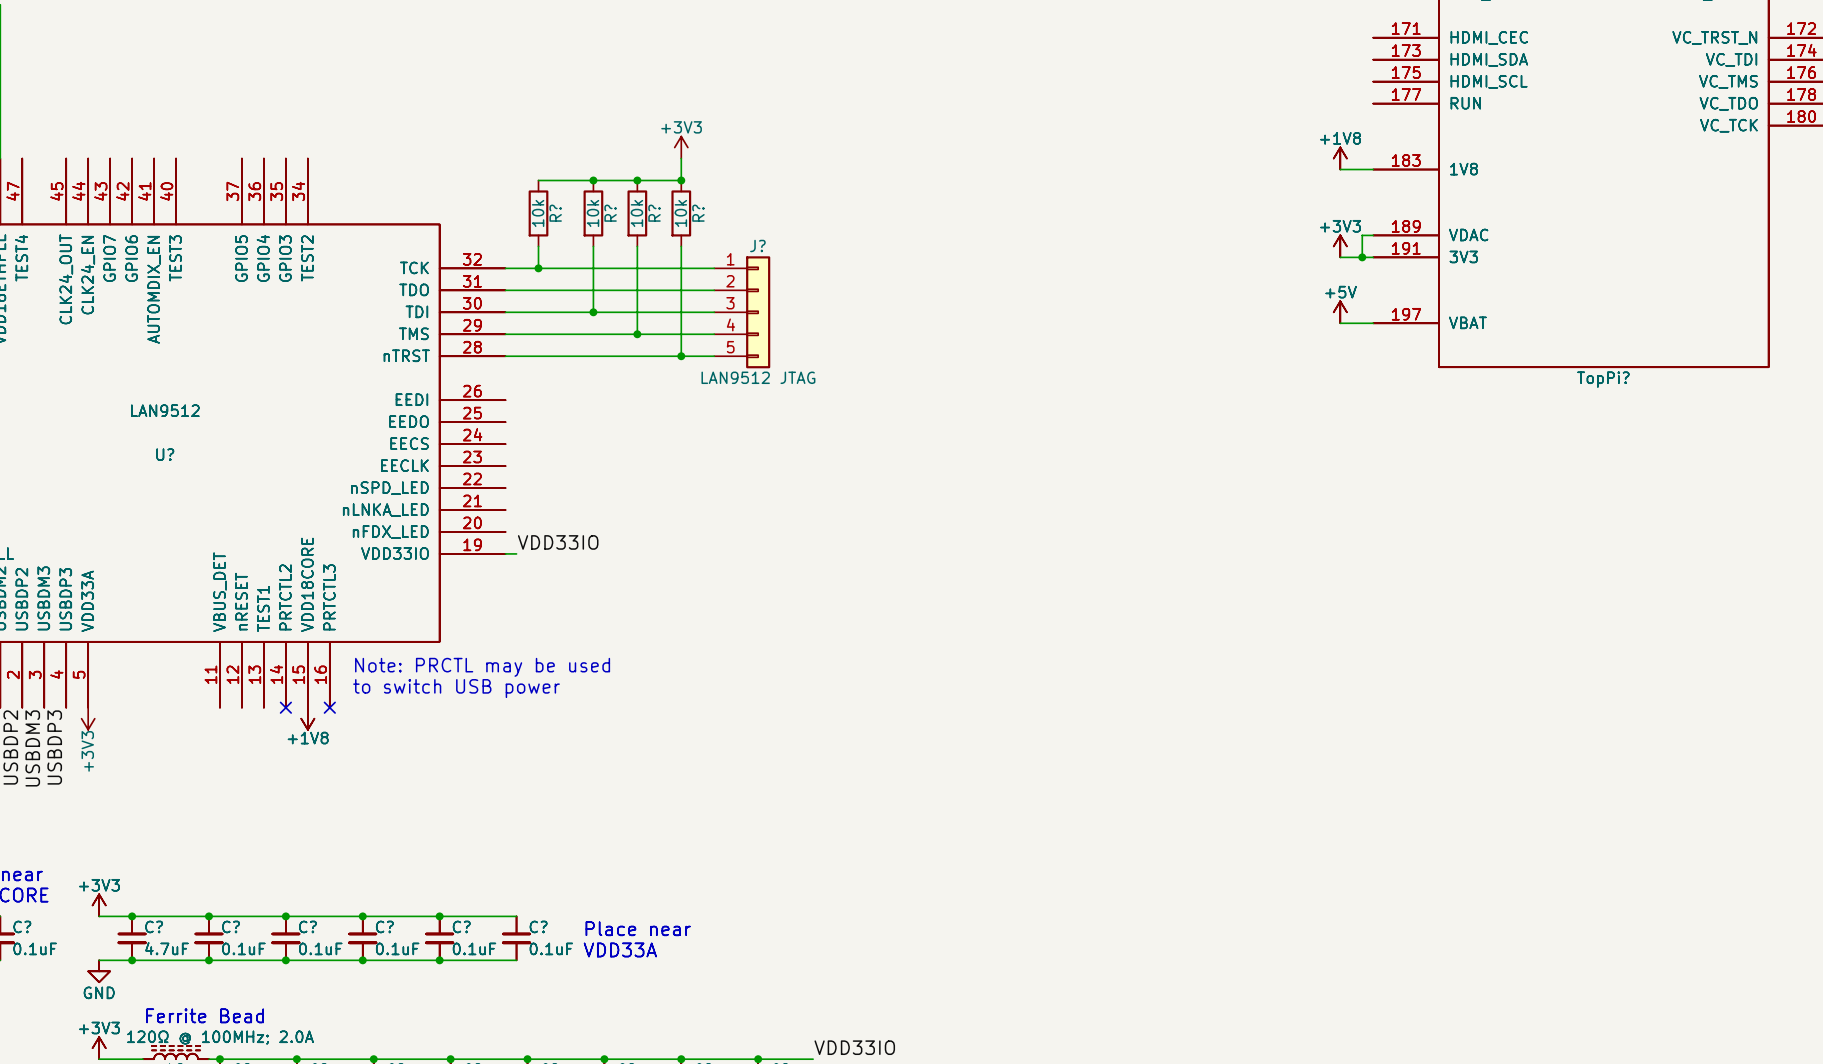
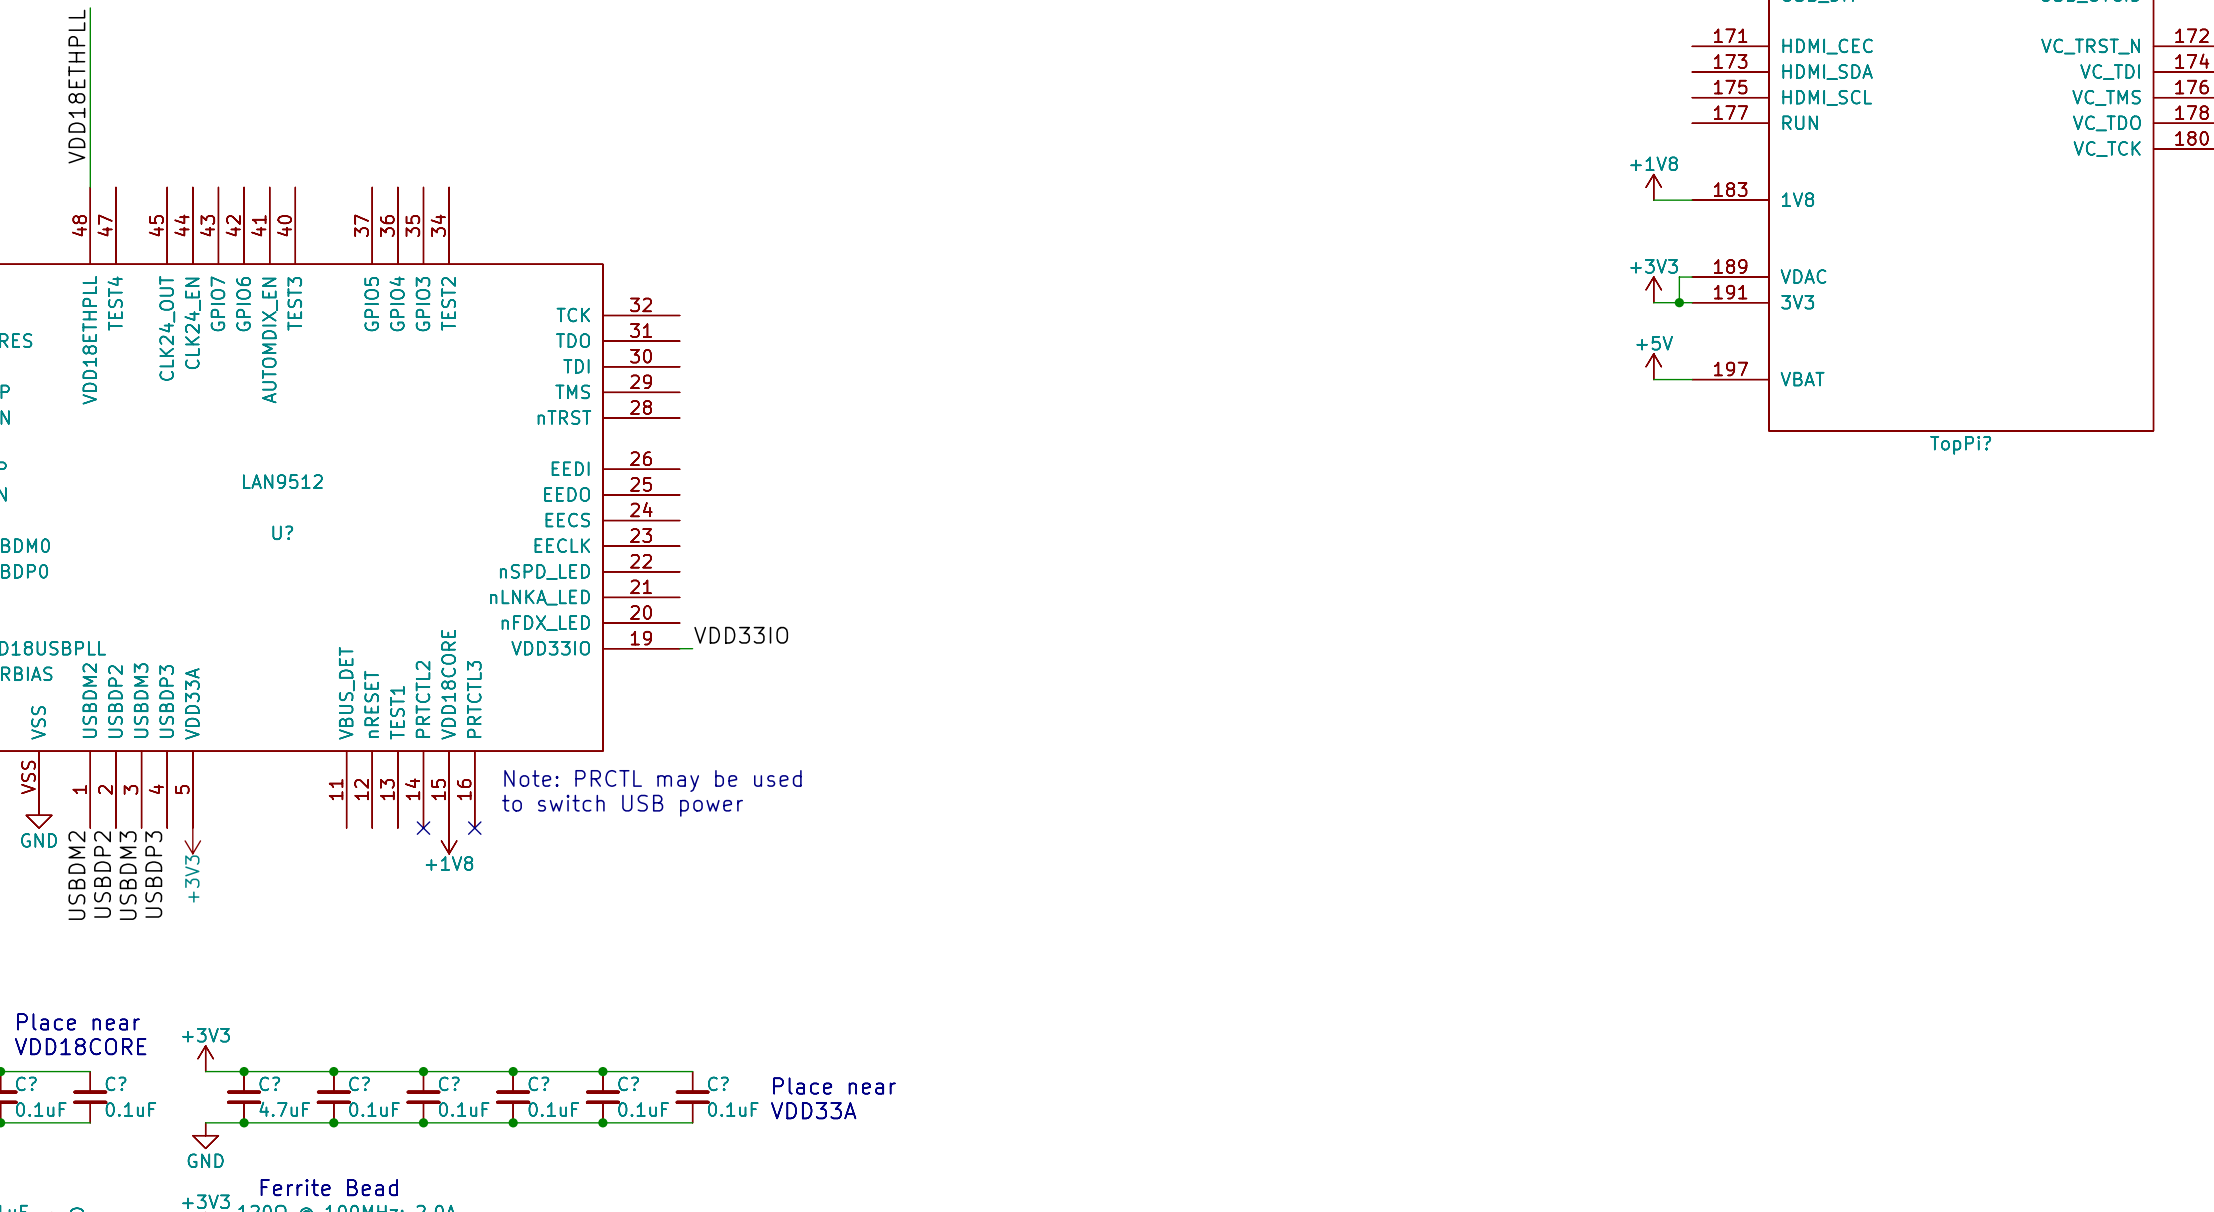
power symbol: +3V3 (681, 147) -> none
wire: (681, 158) (681, 180) (538, 180) -> none
junction: (593, 180) -> none
junction: (637, 180) -> none
junction: (681, 180) -> none
R?: 10k (538, 213) -> none
R?: 10k (593, 213) -> none
R?: 10k (637, 213) -> none
R?: 10k (681, 213) -> none
wire: (538, 246) (538, 268) -> none
wire: (593, 246) (593, 312) -> none
wire: (637, 246) (637, 334) -> none
wire: (681, 246) (681, 356) -> none
wire: (505, 268) (714, 268) -> none
junction: (538, 268) -> none
wire: (505, 290) (714, 290) -> none
wire: (505, 312) (714, 312) -> none
junction: (593, 312) -> none
J?: LAN9512 JTAG (742, 312) -> none
wire: (505, 334) (714, 334) -> none
junction: (637, 334) -> none
wire: (505, 356) (714, 356) -> none
junction: (681, 356) -> none

